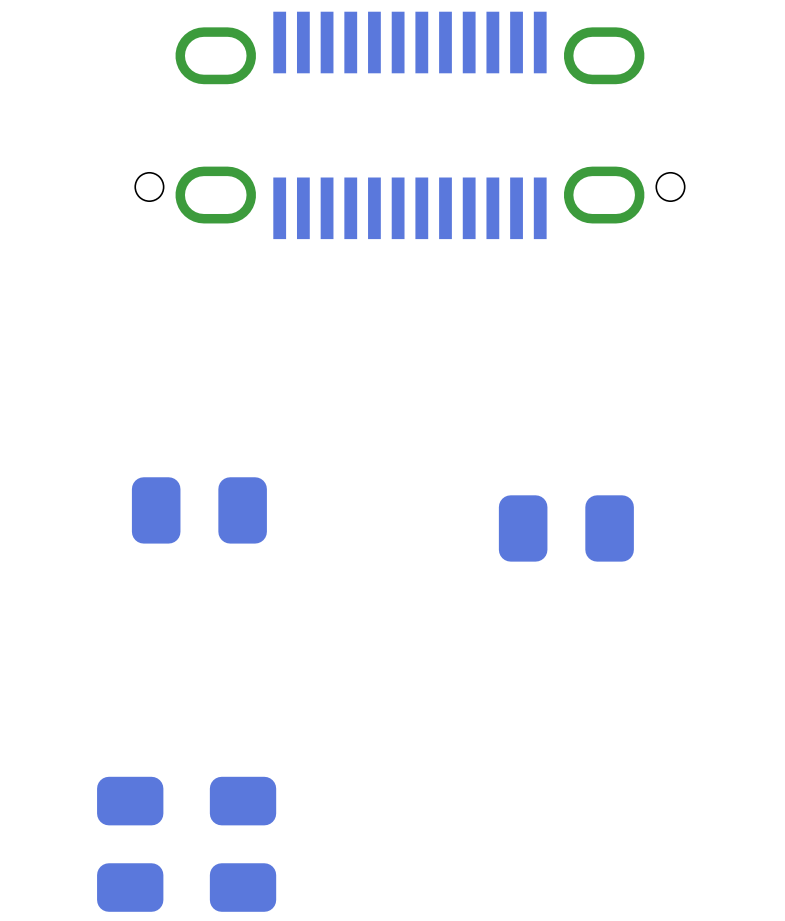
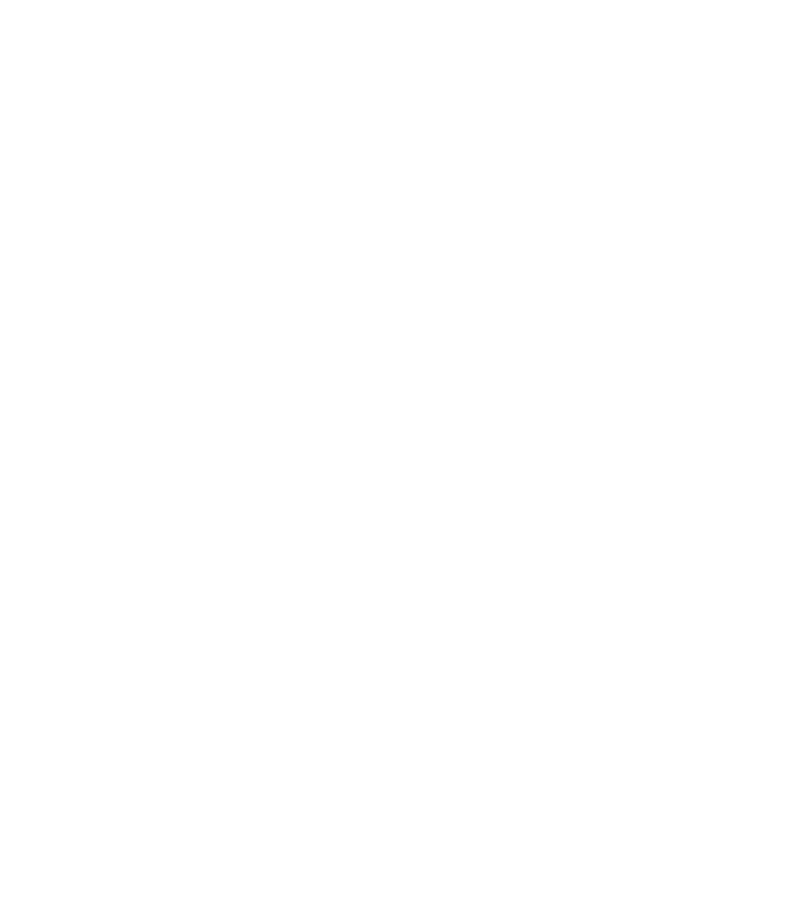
part: (409, 125) -> none
part: (199, 510) -> none
part: (566, 528) -> none
part: (130, 844) -> none
part: (243, 844) -> none

